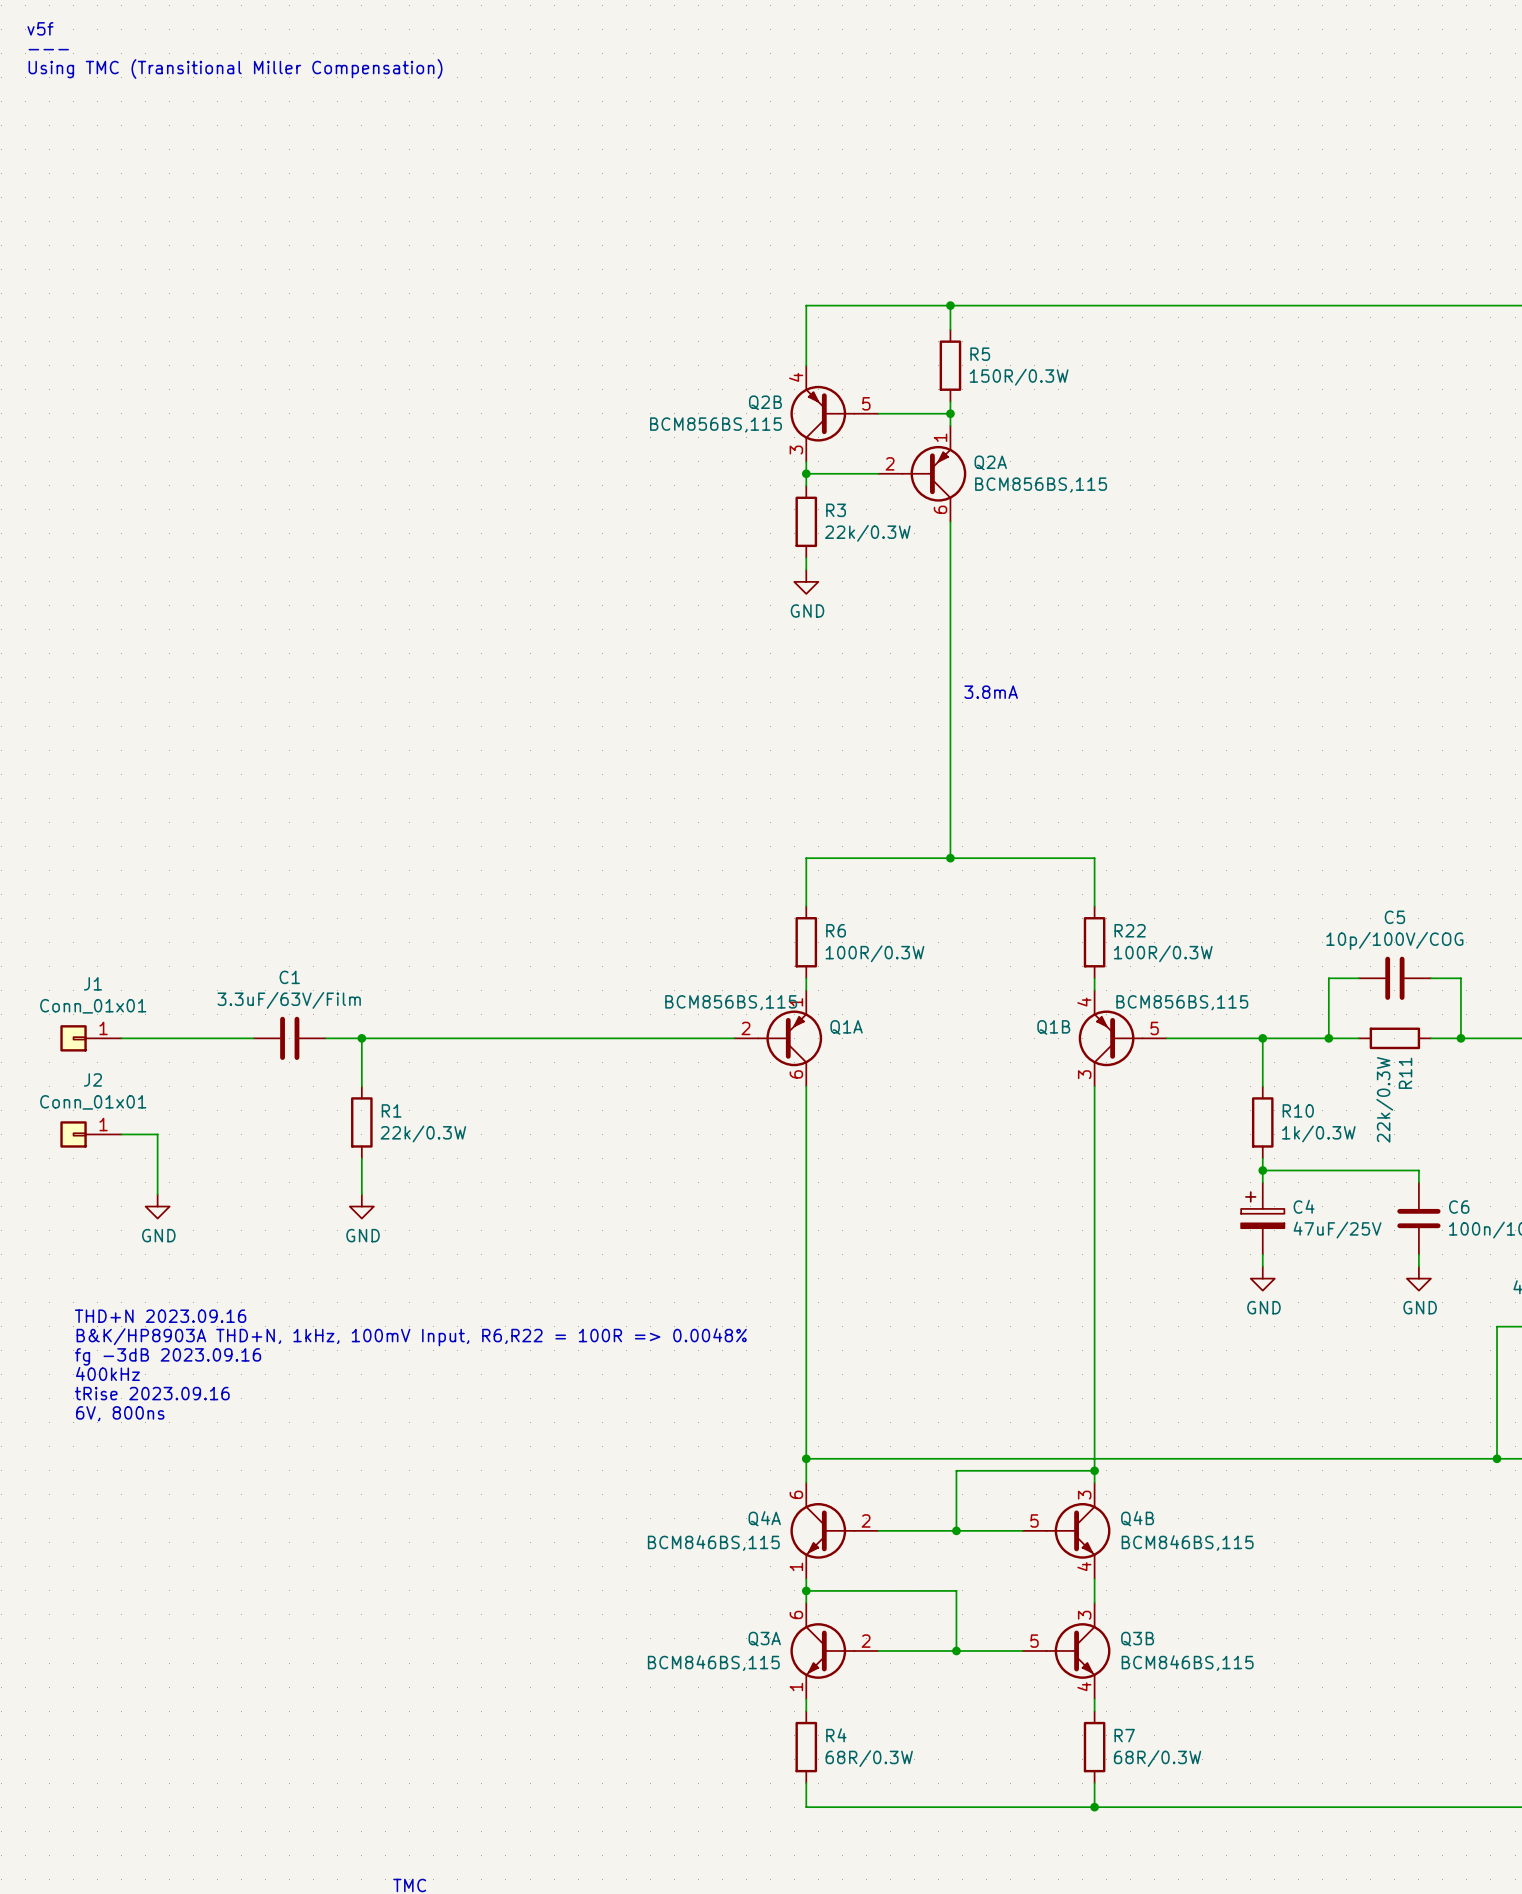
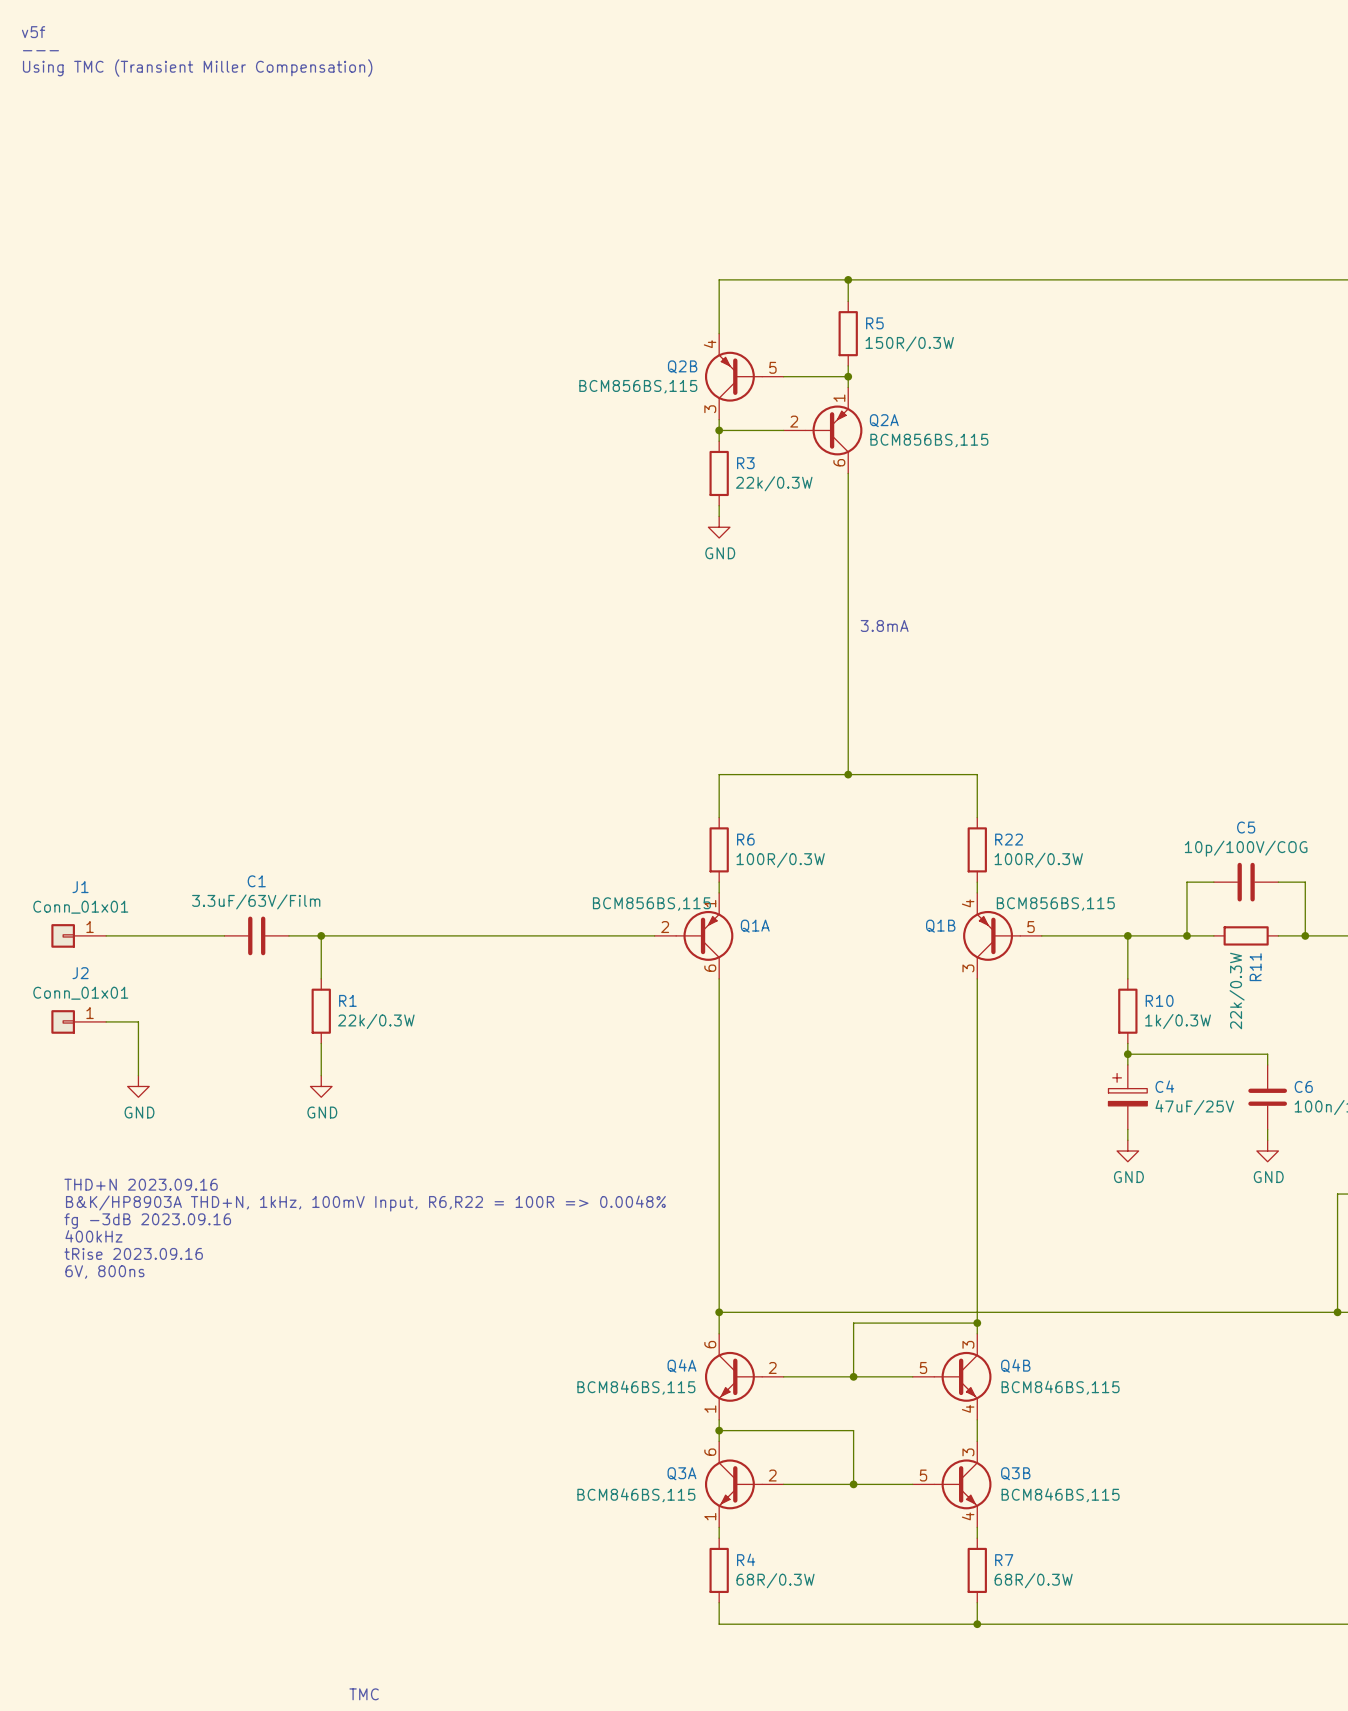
text: Using TMC (Transitional Miller Compensation) (235, 68) -> Using TMC (Transient Miller Compensation) (197, 68)

